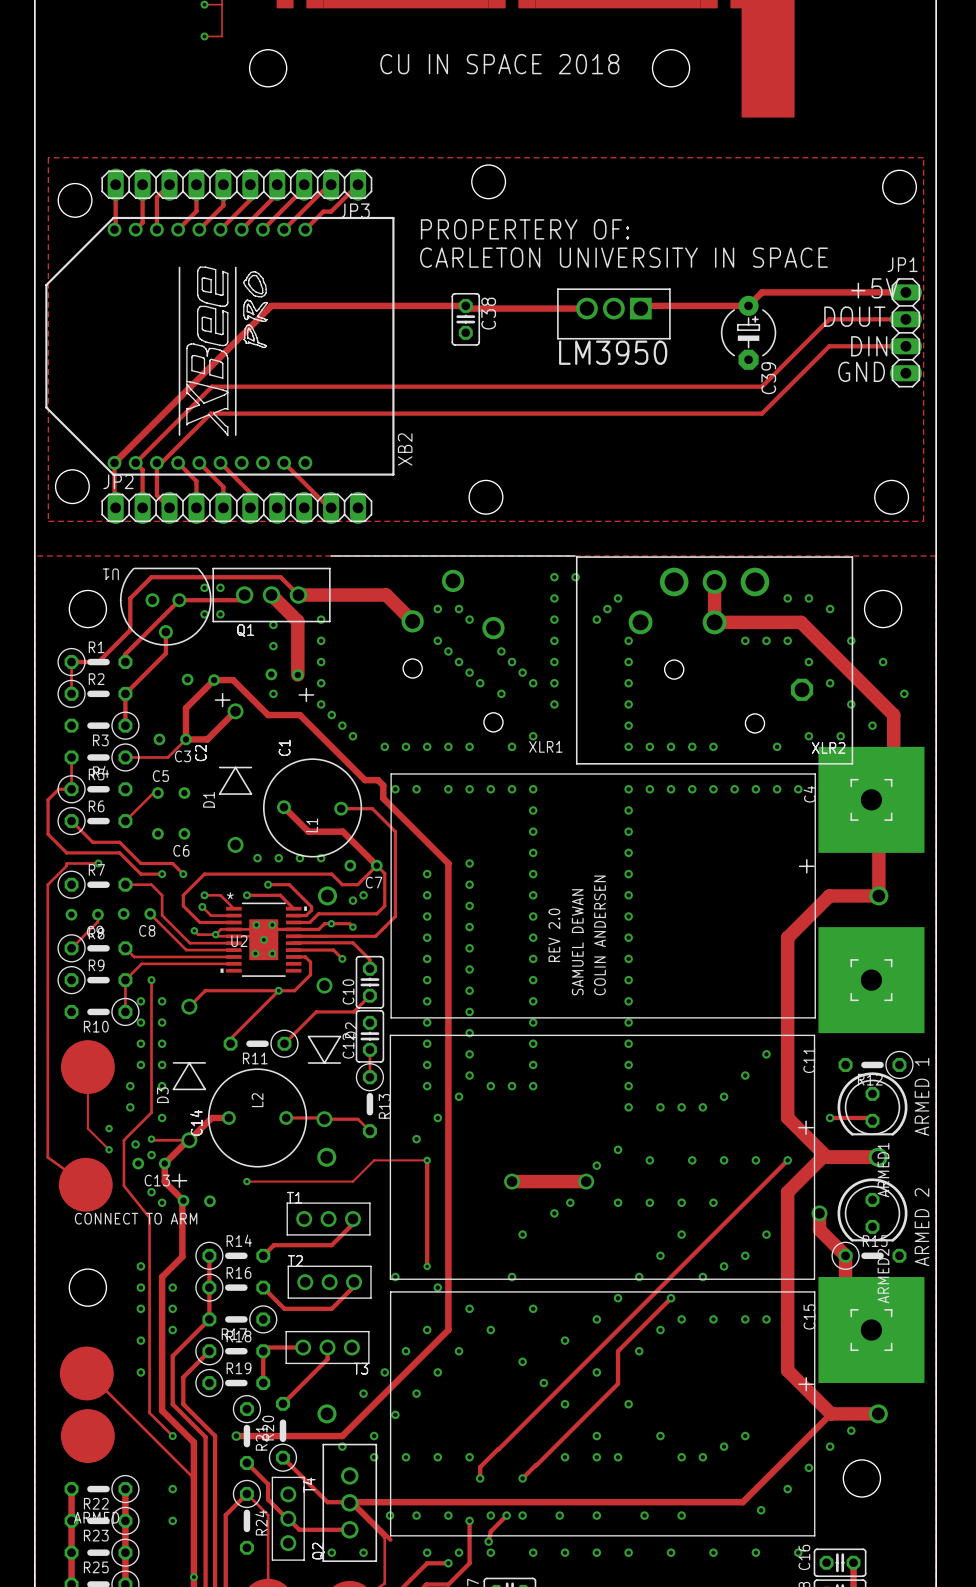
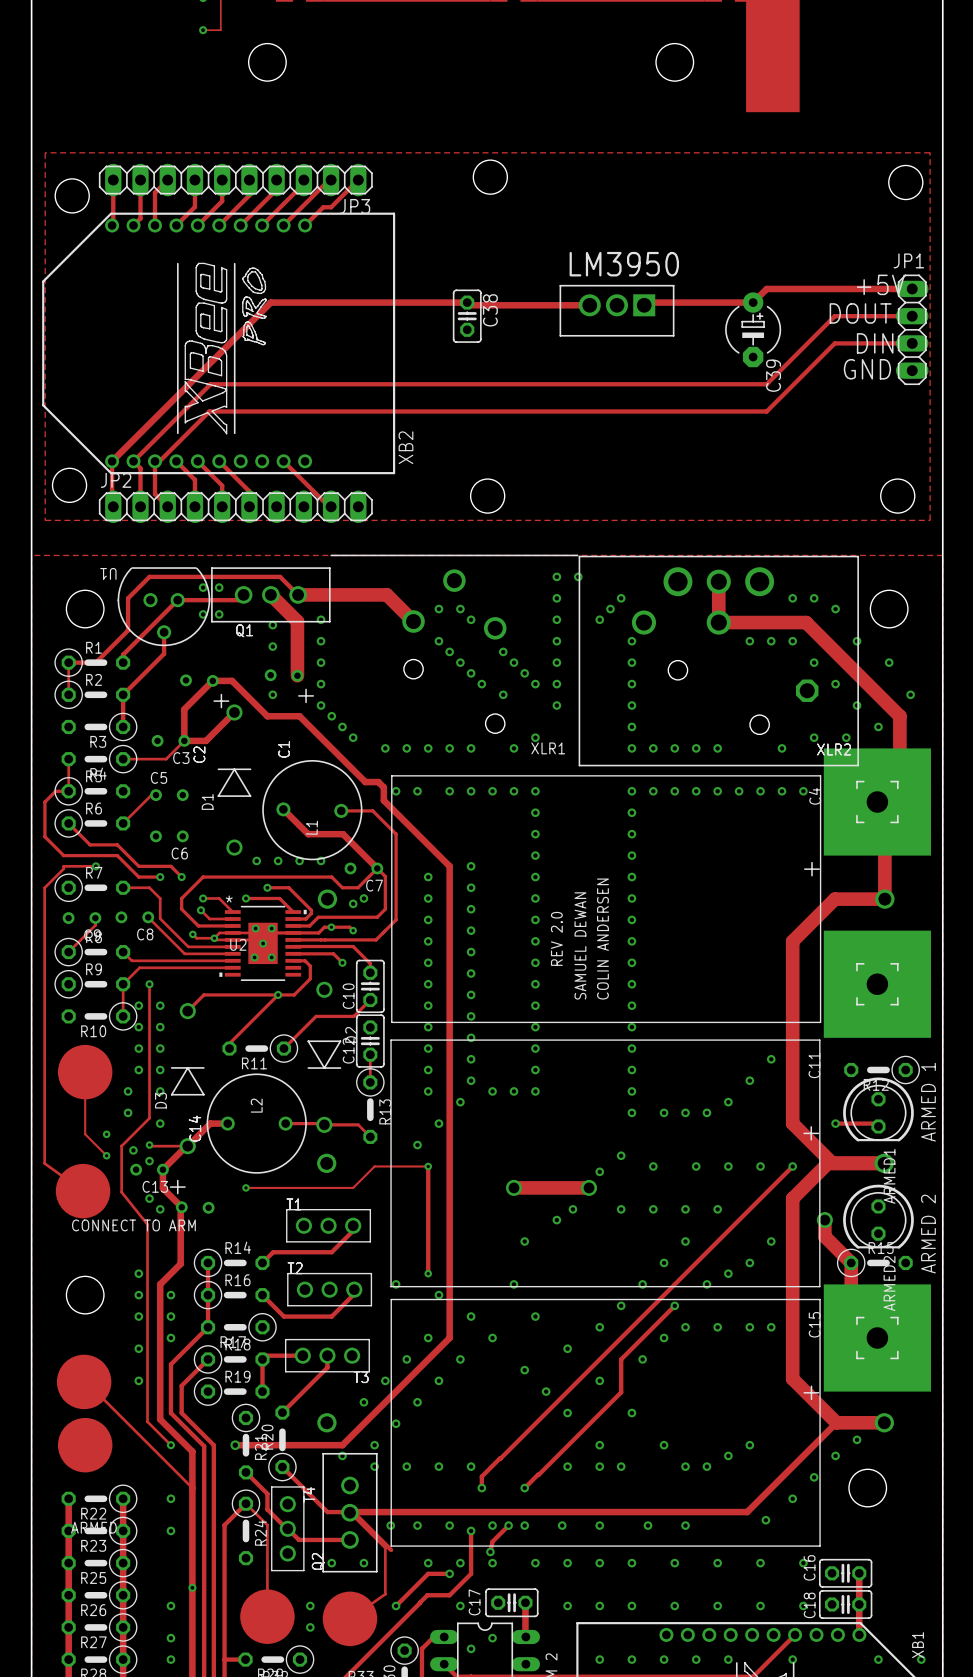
text: CU IN SPACE 2018 (499, 64) -> none
text: PROPERTERY OF: (525, 229) -> none
text: CARLETON UNIVERSITY IN SPACE (624, 257) -> none
LM3950 name position: LM3950 (613, 352) -> LM3950 (624, 264)

